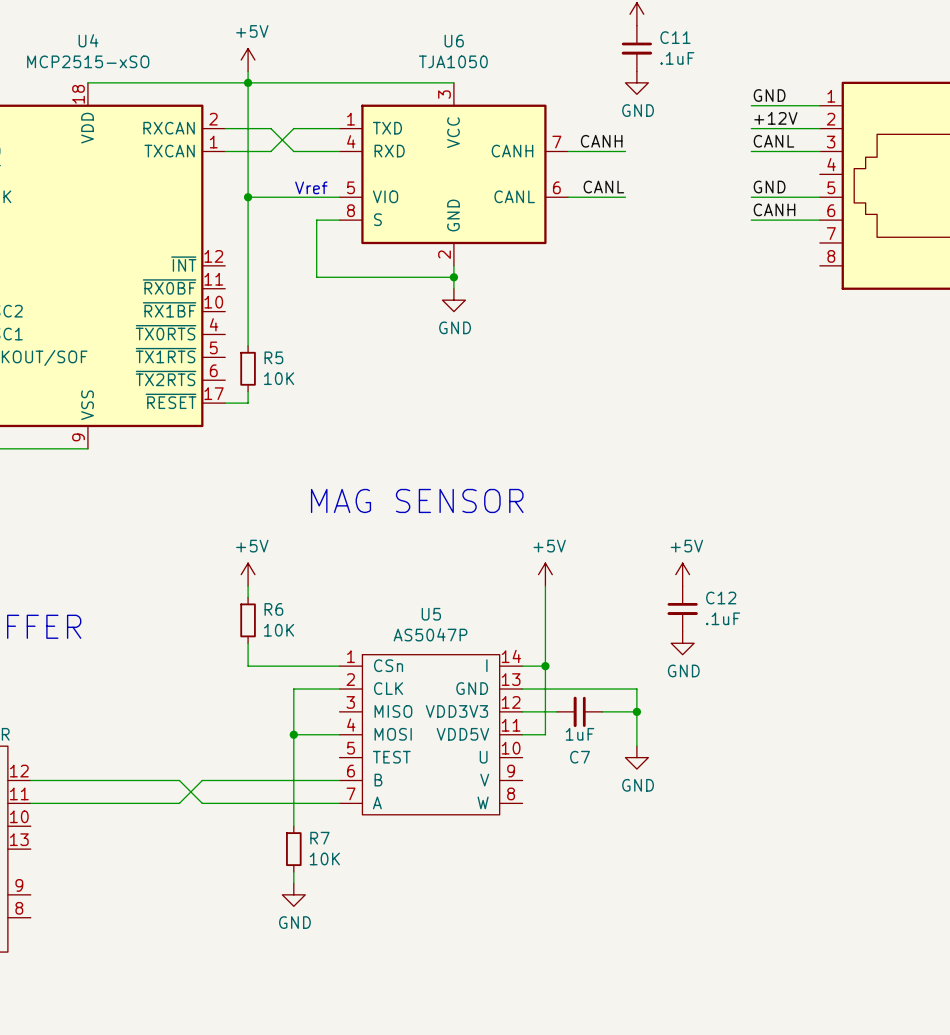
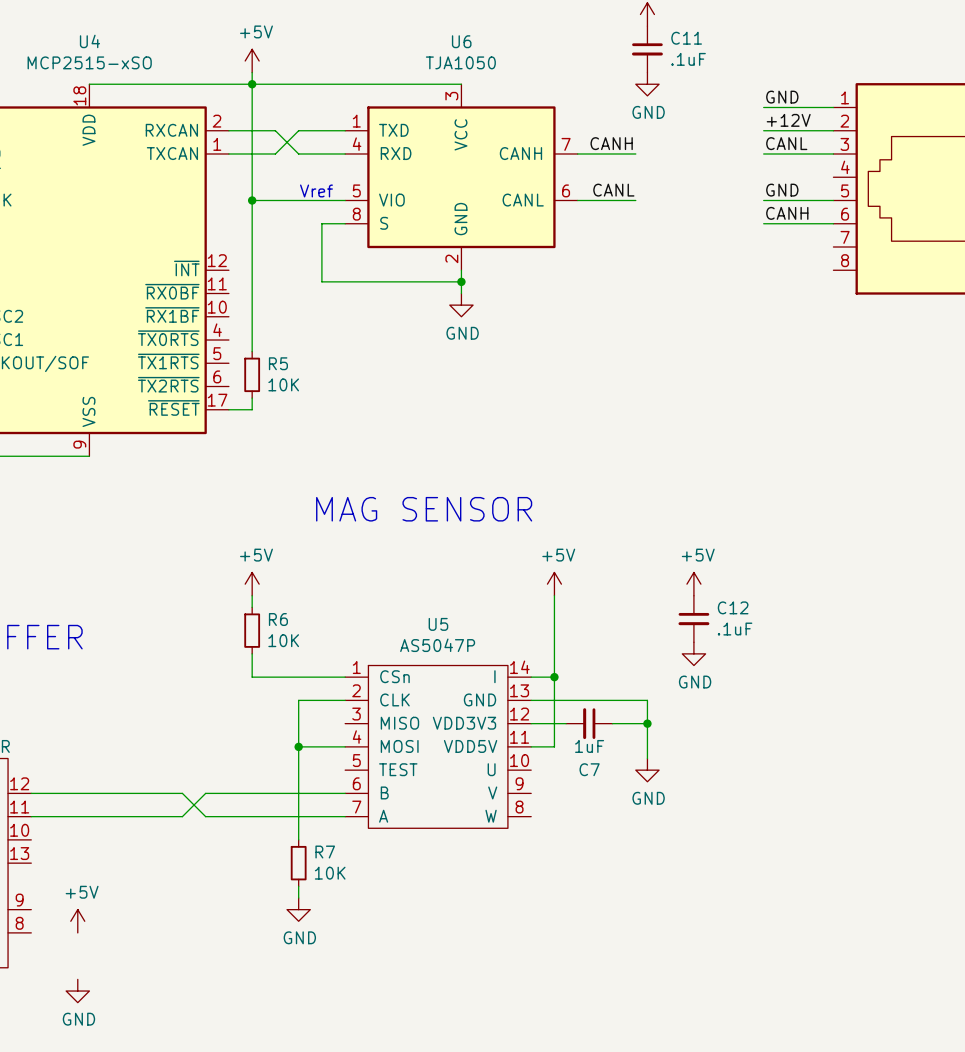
power symbol: none -> +5V (77, 921)
power symbol: none -> GND (77, 991)

